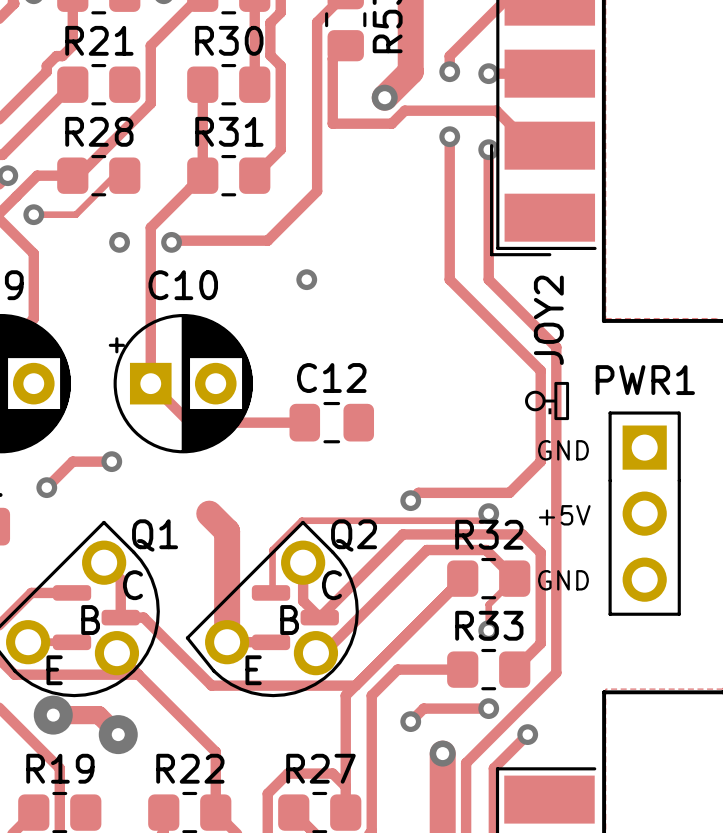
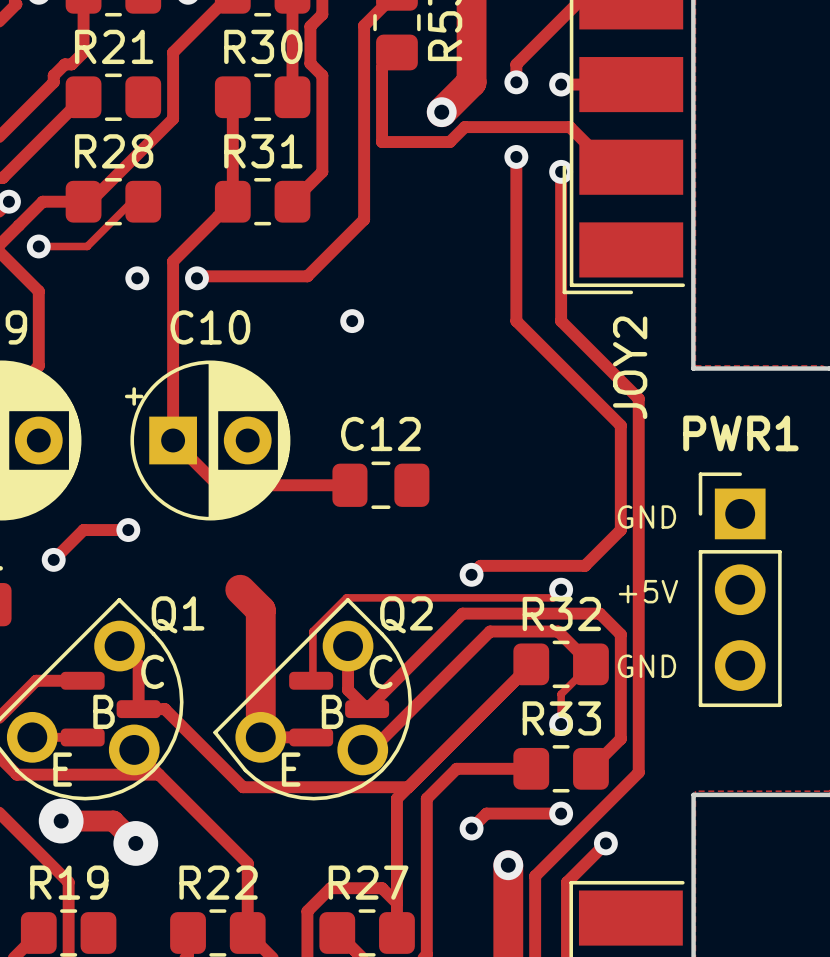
text: none -> PWR1 (740, 433)
drawing: [525, 381, 570, 421] -> none
PWR1: (644, 513) -> none
part: none -> (740, 589)

